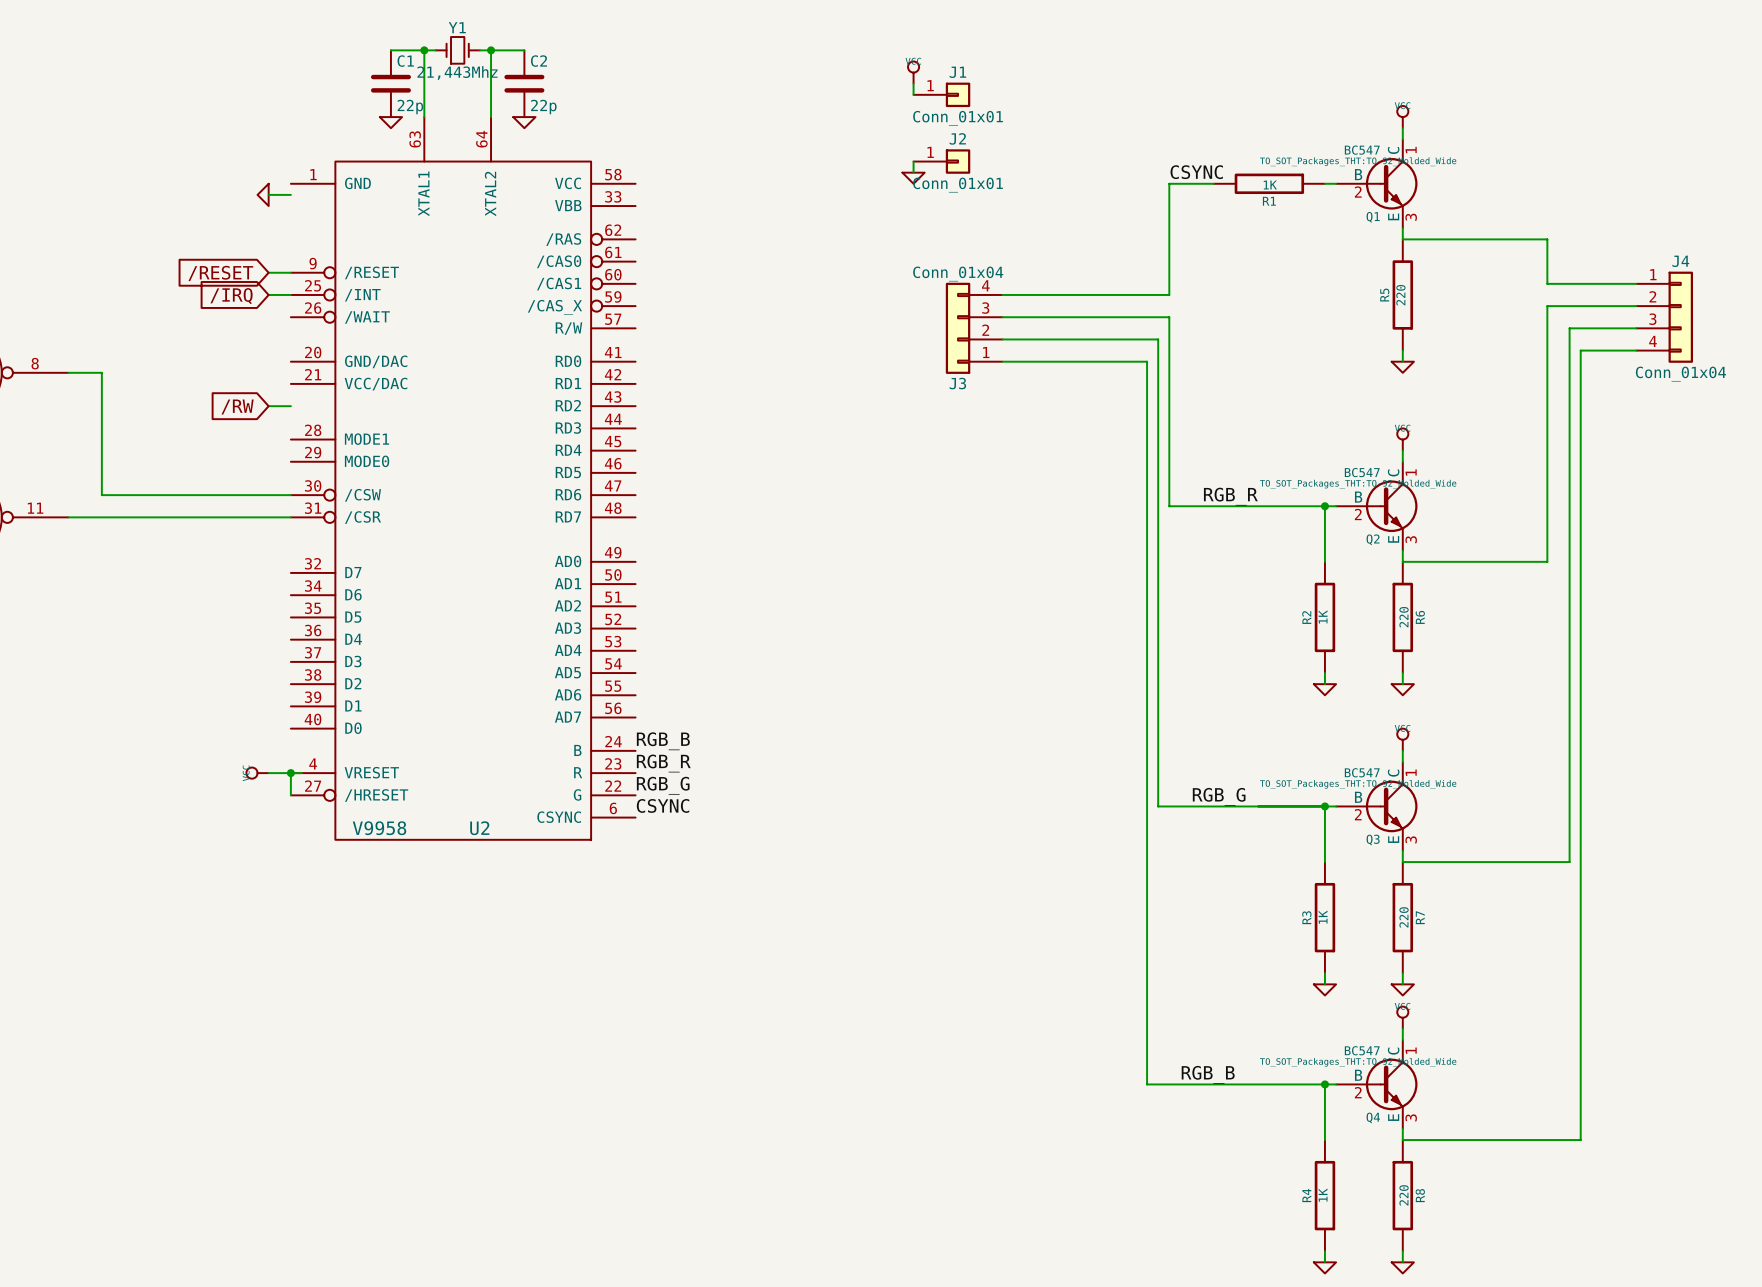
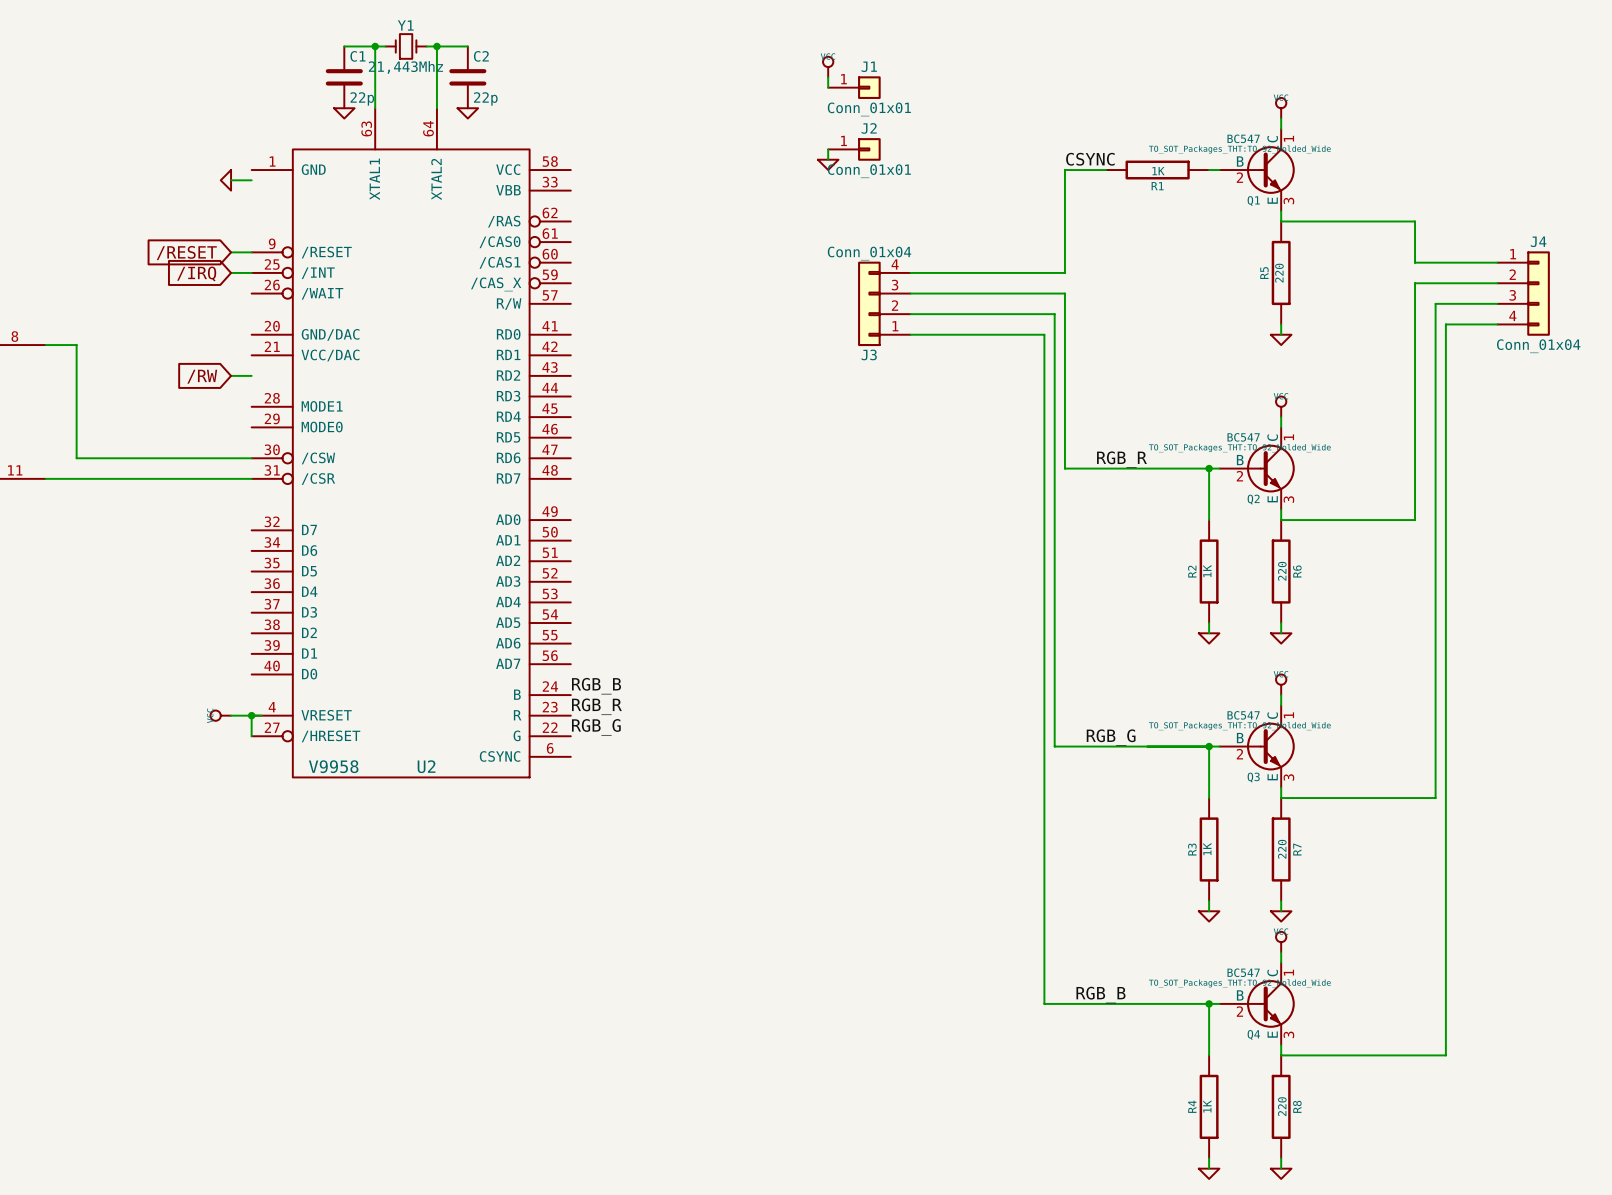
label: CSYNC (663, 805) -> none

